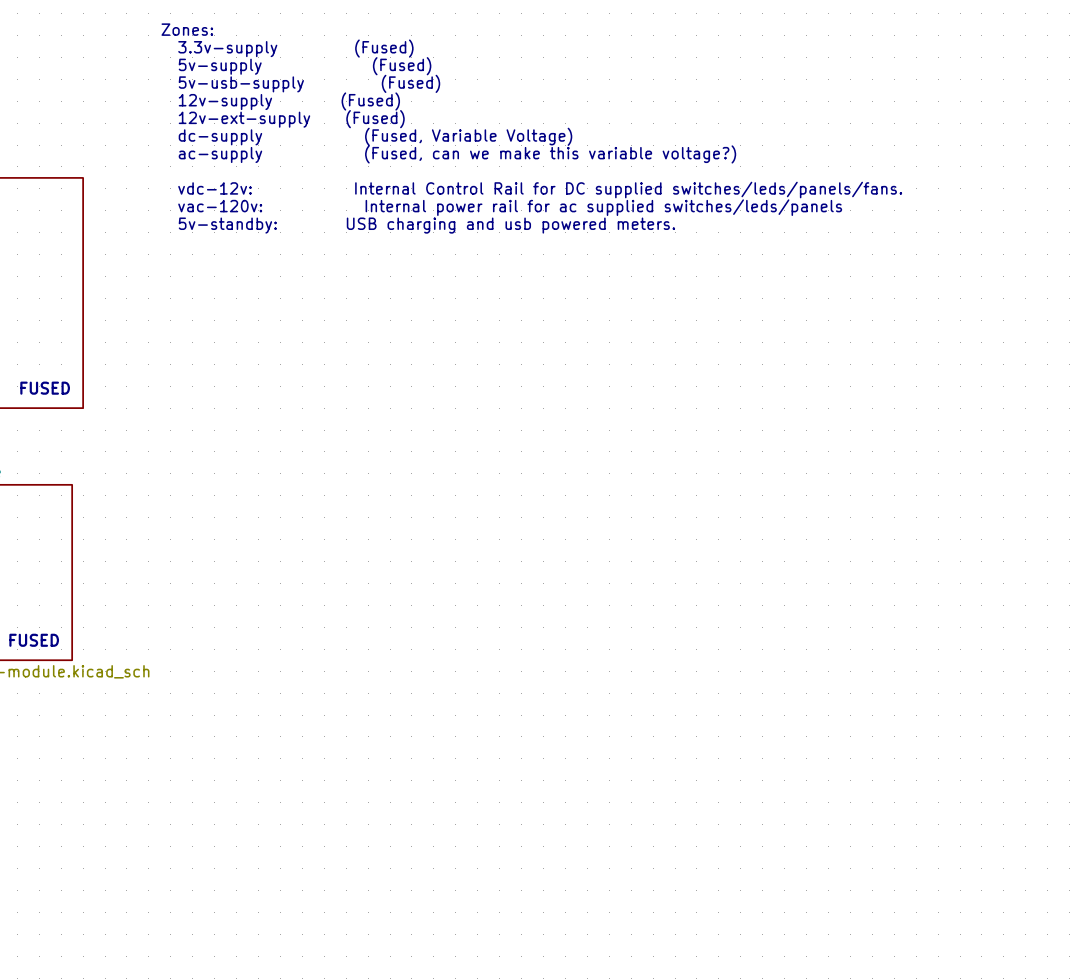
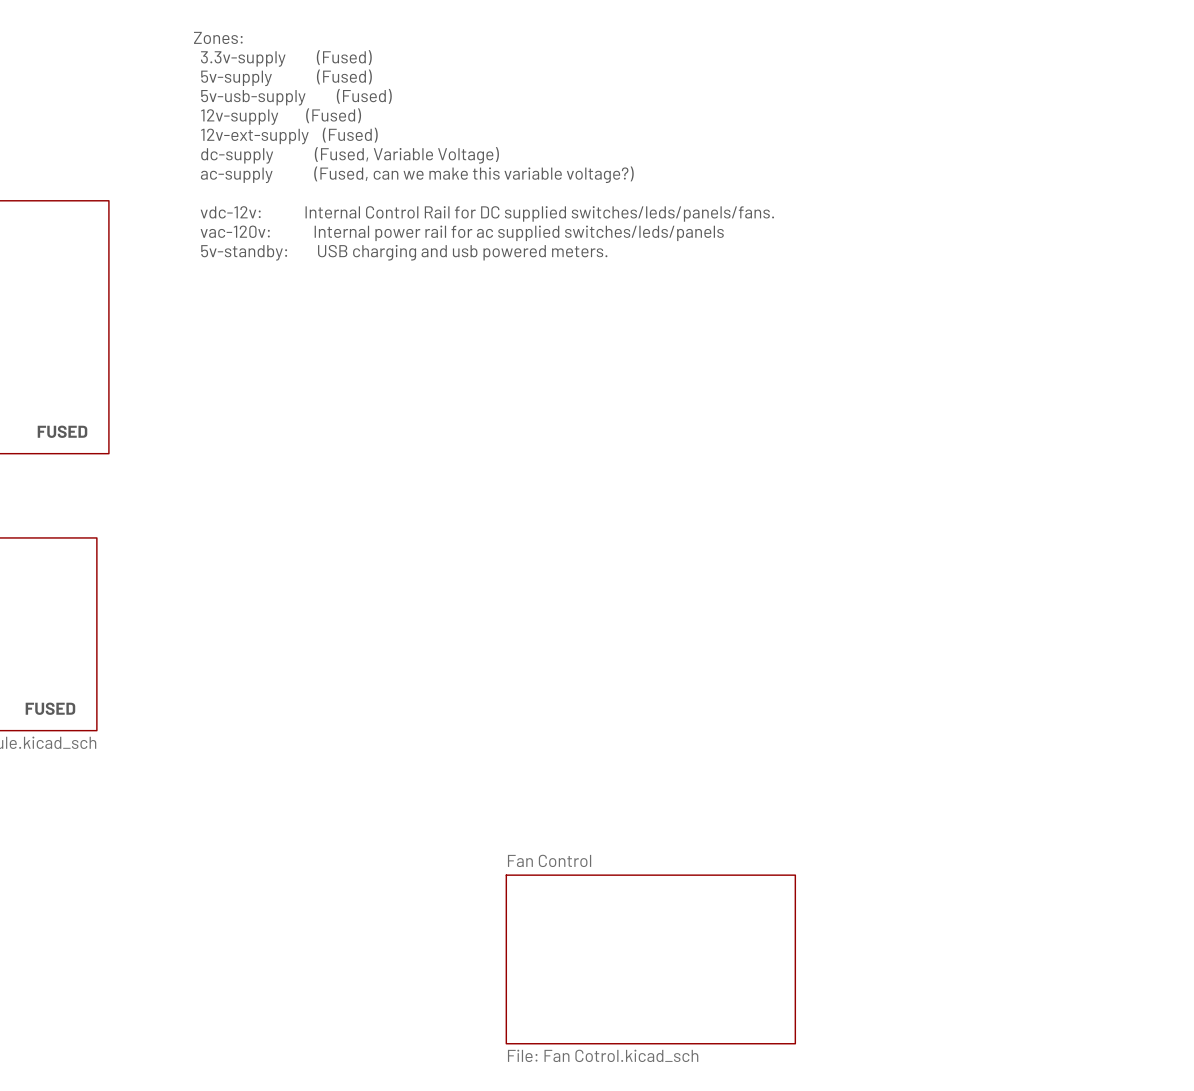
sheet Fan Control: none -> File: Fan Cotrol.kicad_sch (650, 959)

